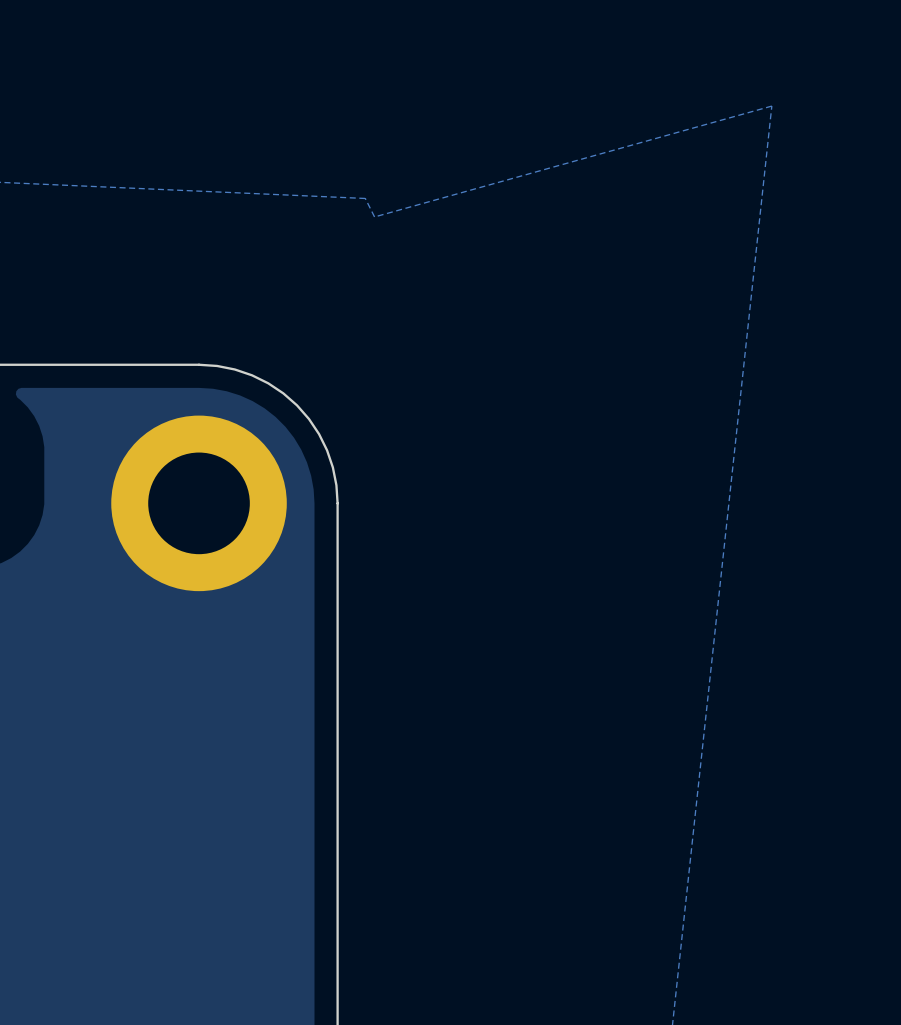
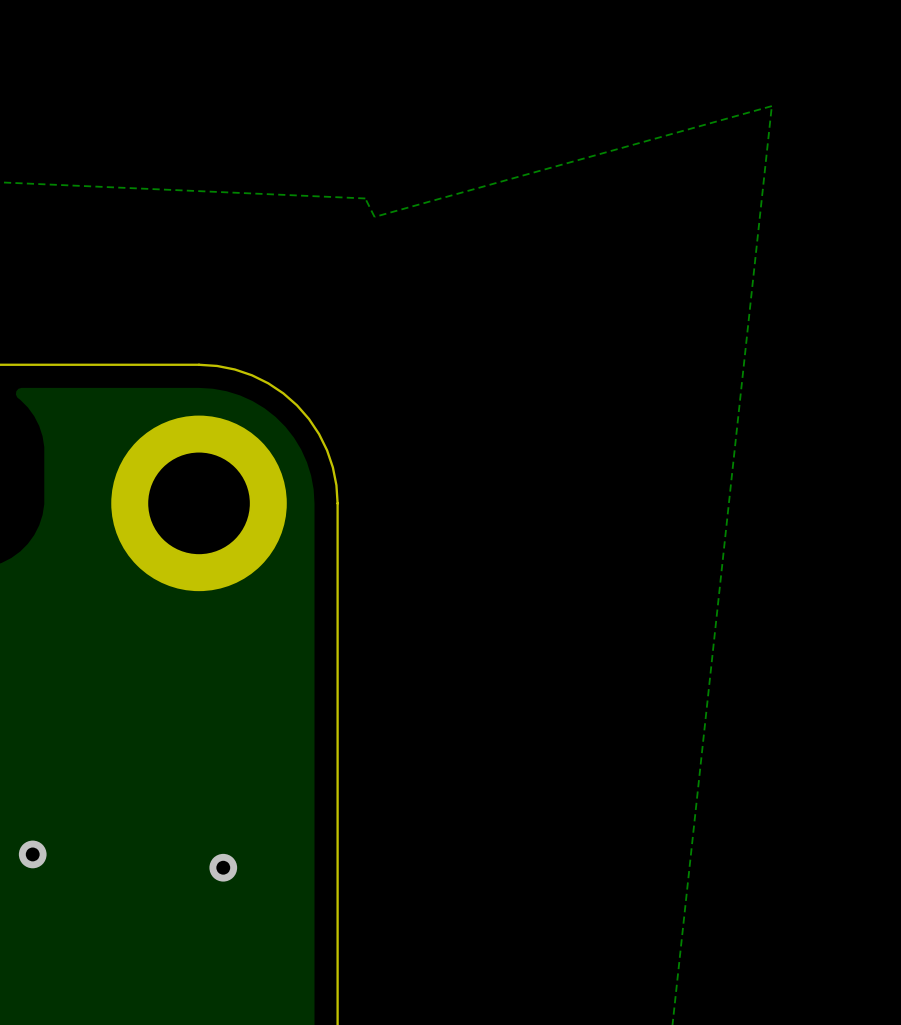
via: none -> (32, 854)
via: none -> (223, 867)

